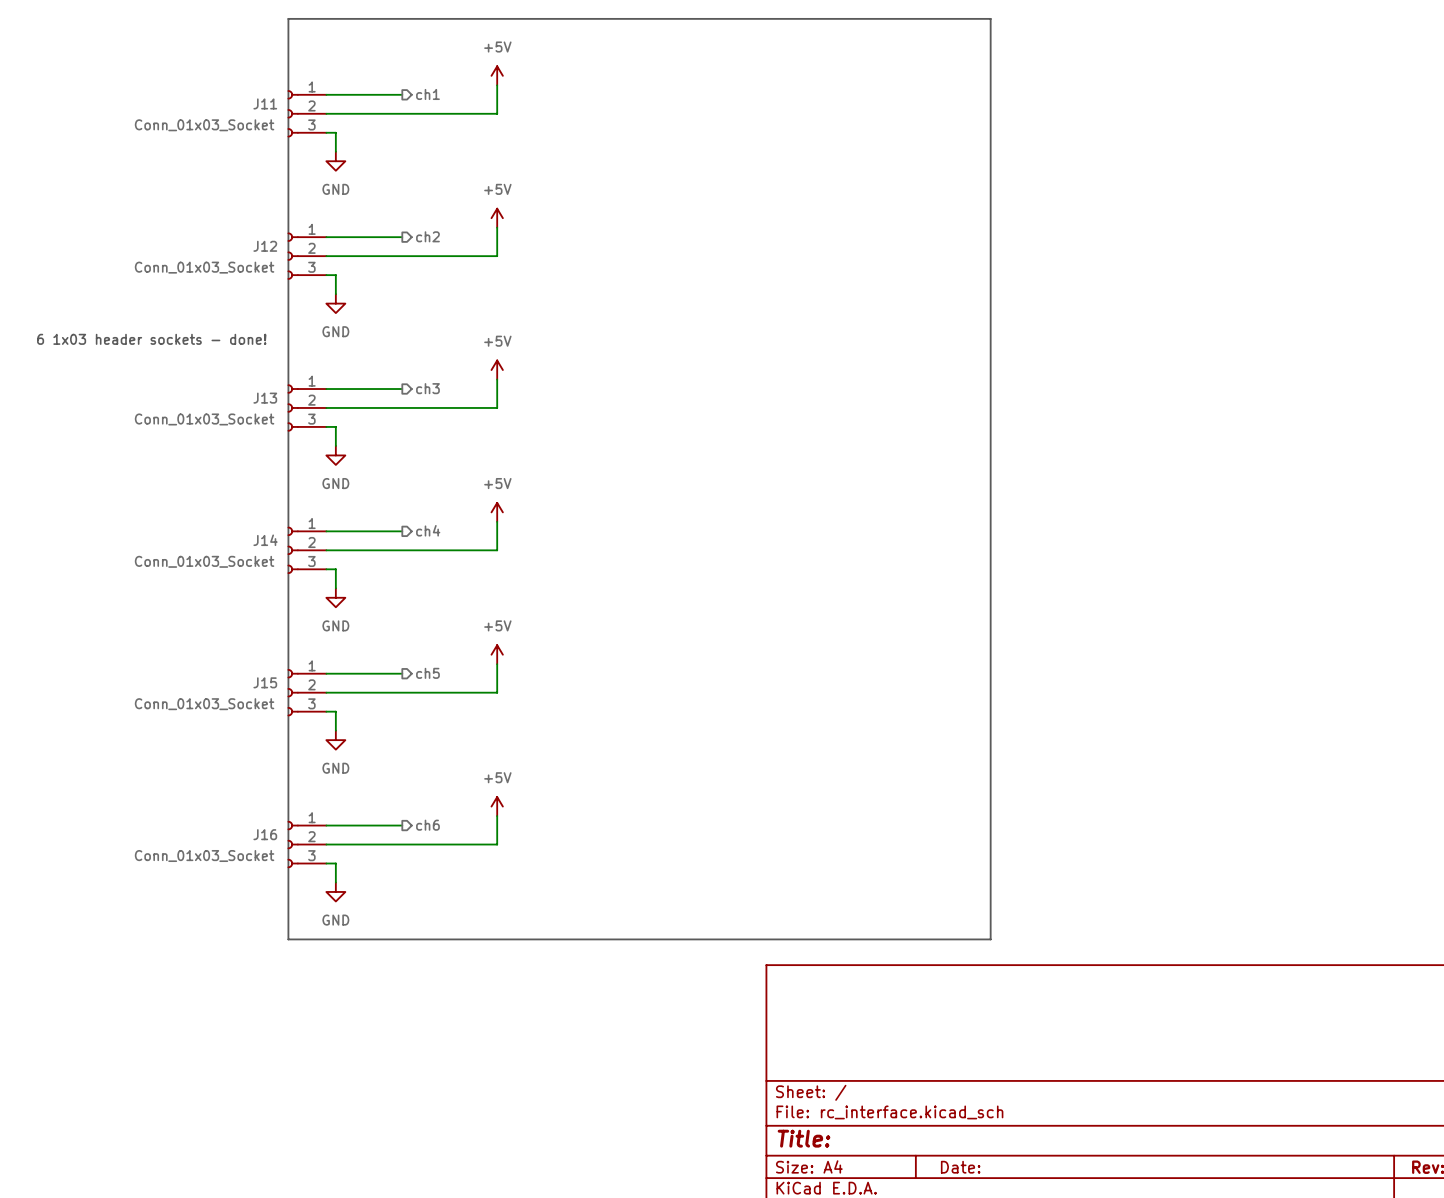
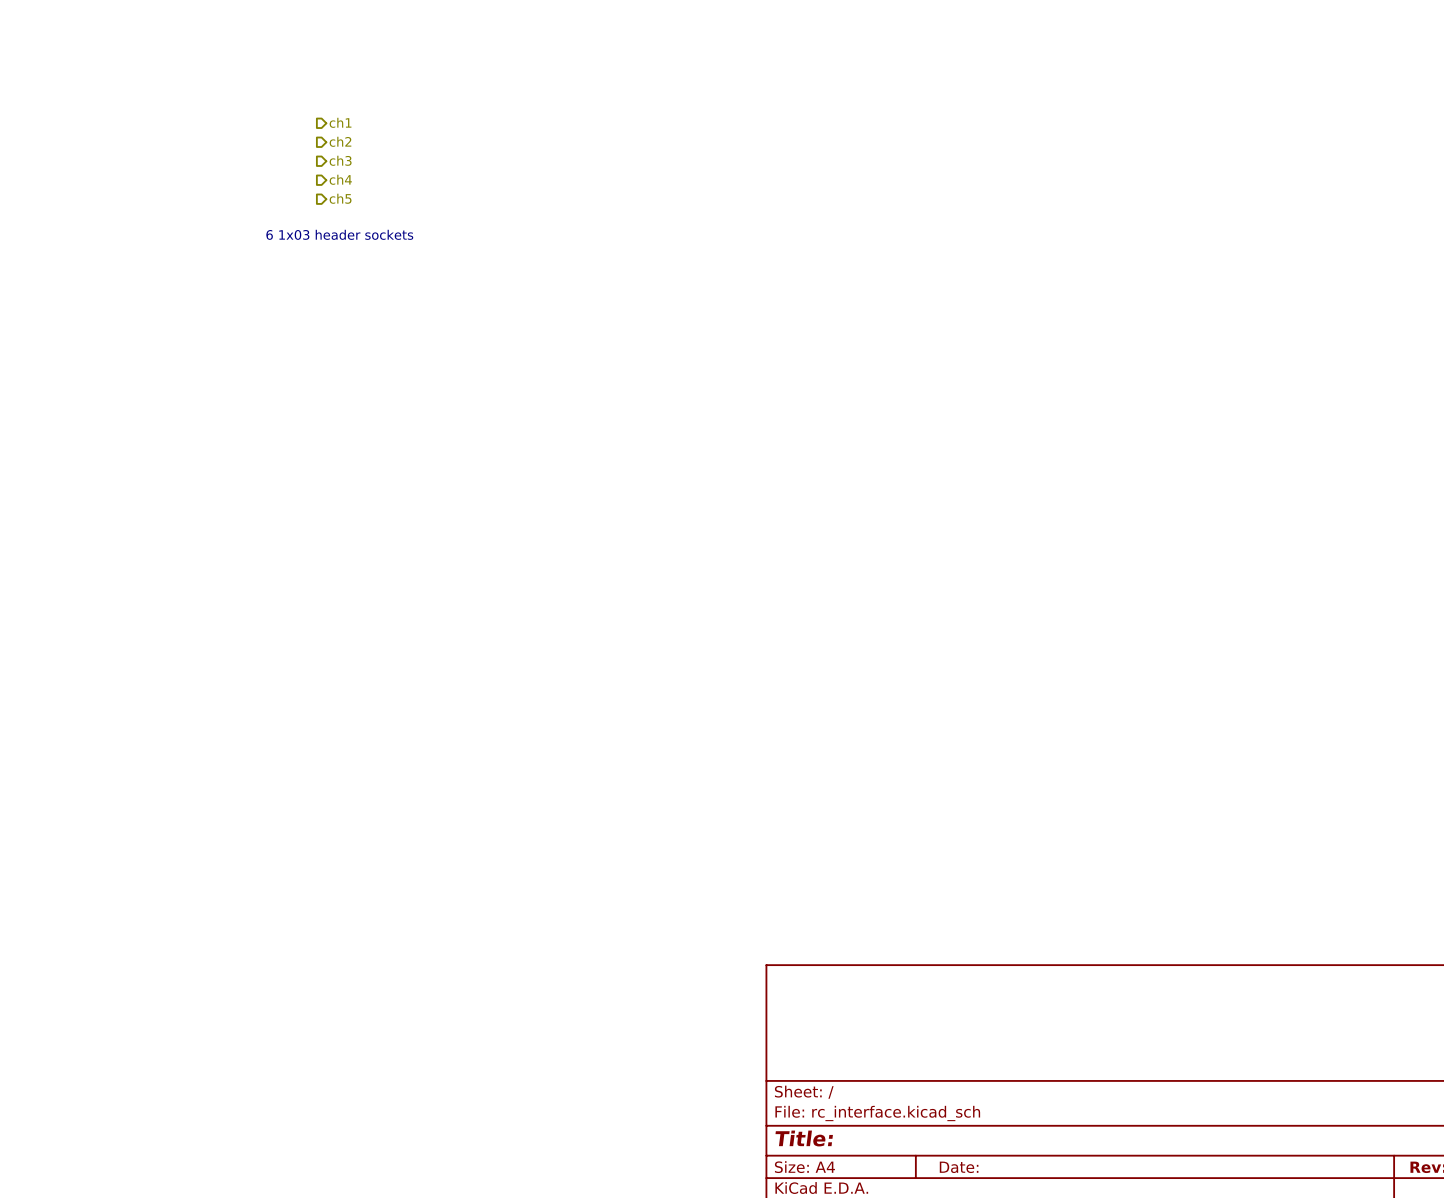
line: (288, 18) (990, 18) (990, 939) (288, 939) (288, 18) -> none
power symbol: +5V (497, 75) -> none
wire: (497, 85) (497, 113) (326, 113) -> none
wire: (326, 94) (402, 94) -> none
hierarchical label position: ch1 (427, 94) -> ch1 (340, 122)
J11: Conn_01x03_Socket (307, 113) -> none
wire: (326, 132) (335, 132) (335, 151) -> none
hierarchical label: none -> ch3 (340, 160)
power symbol: GND (335, 161) -> none
hierarchical label: none -> ch4 (340, 179)
hierarchical label: none -> ch5 (340, 198)
power symbol: +5V (497, 218) -> none
wire: (497, 227) (497, 256) (326, 256) -> none
text: none -> 6 1x03 header sockets (339, 234)
hierarchical label position: ch2 (427, 236) -> ch2 (340, 141)
wire: (326, 237) (402, 237) -> none
J12: Conn_01x03_Socket (307, 256) -> none
wire: (326, 275) (335, 275) (335, 294) -> none
power symbol: GND (335, 303) -> none
text: 6 1x03 header sockets - done! (151, 339) -> none
power symbol: +5V (497, 370) -> none
wire: (497, 379) (497, 407) (326, 407) -> none
hierarchical label: ch3 (427, 388) -> none
wire: (326, 389) (402, 389) -> none
J13: Conn_01x03_Socket (307, 407) -> none
wire: (326, 426) (335, 426) (335, 445) -> none
power symbol: GND (335, 455) -> none
power symbol: +5V (497, 512) -> none
wire: (497, 521) (497, 550) (326, 550) -> none
hierarchical label: ch4 (428, 530) -> none
wire: (326, 531) (402, 531) -> none
J14: Conn_01x03_Socket (307, 550) -> none
wire: (326, 569) (335, 569) (335, 588) -> none
power symbol: GND (335, 597) -> none
power symbol: +5V (497, 654) -> none
wire: (497, 664) (497, 692) (326, 692) -> none
wire: (326, 673) (402, 673) -> none
hierarchical label: ch5 (427, 673) -> none
J15: Conn_01x03_Socket (307, 692) -> none
wire: (326, 711) (335, 711) (335, 730) -> none
power symbol: GND (335, 740) -> none
power symbol: +5V (497, 806) -> none
wire: (497, 816) (497, 844) (326, 844) -> none
wire: (326, 825) (402, 825) -> none
hierarchical label: ch6 (427, 825) -> none
J16: Conn_01x03_Socket (307, 844) -> none
wire: (326, 863) (335, 863) (335, 882) -> none
power symbol: GND (335, 891) -> none

